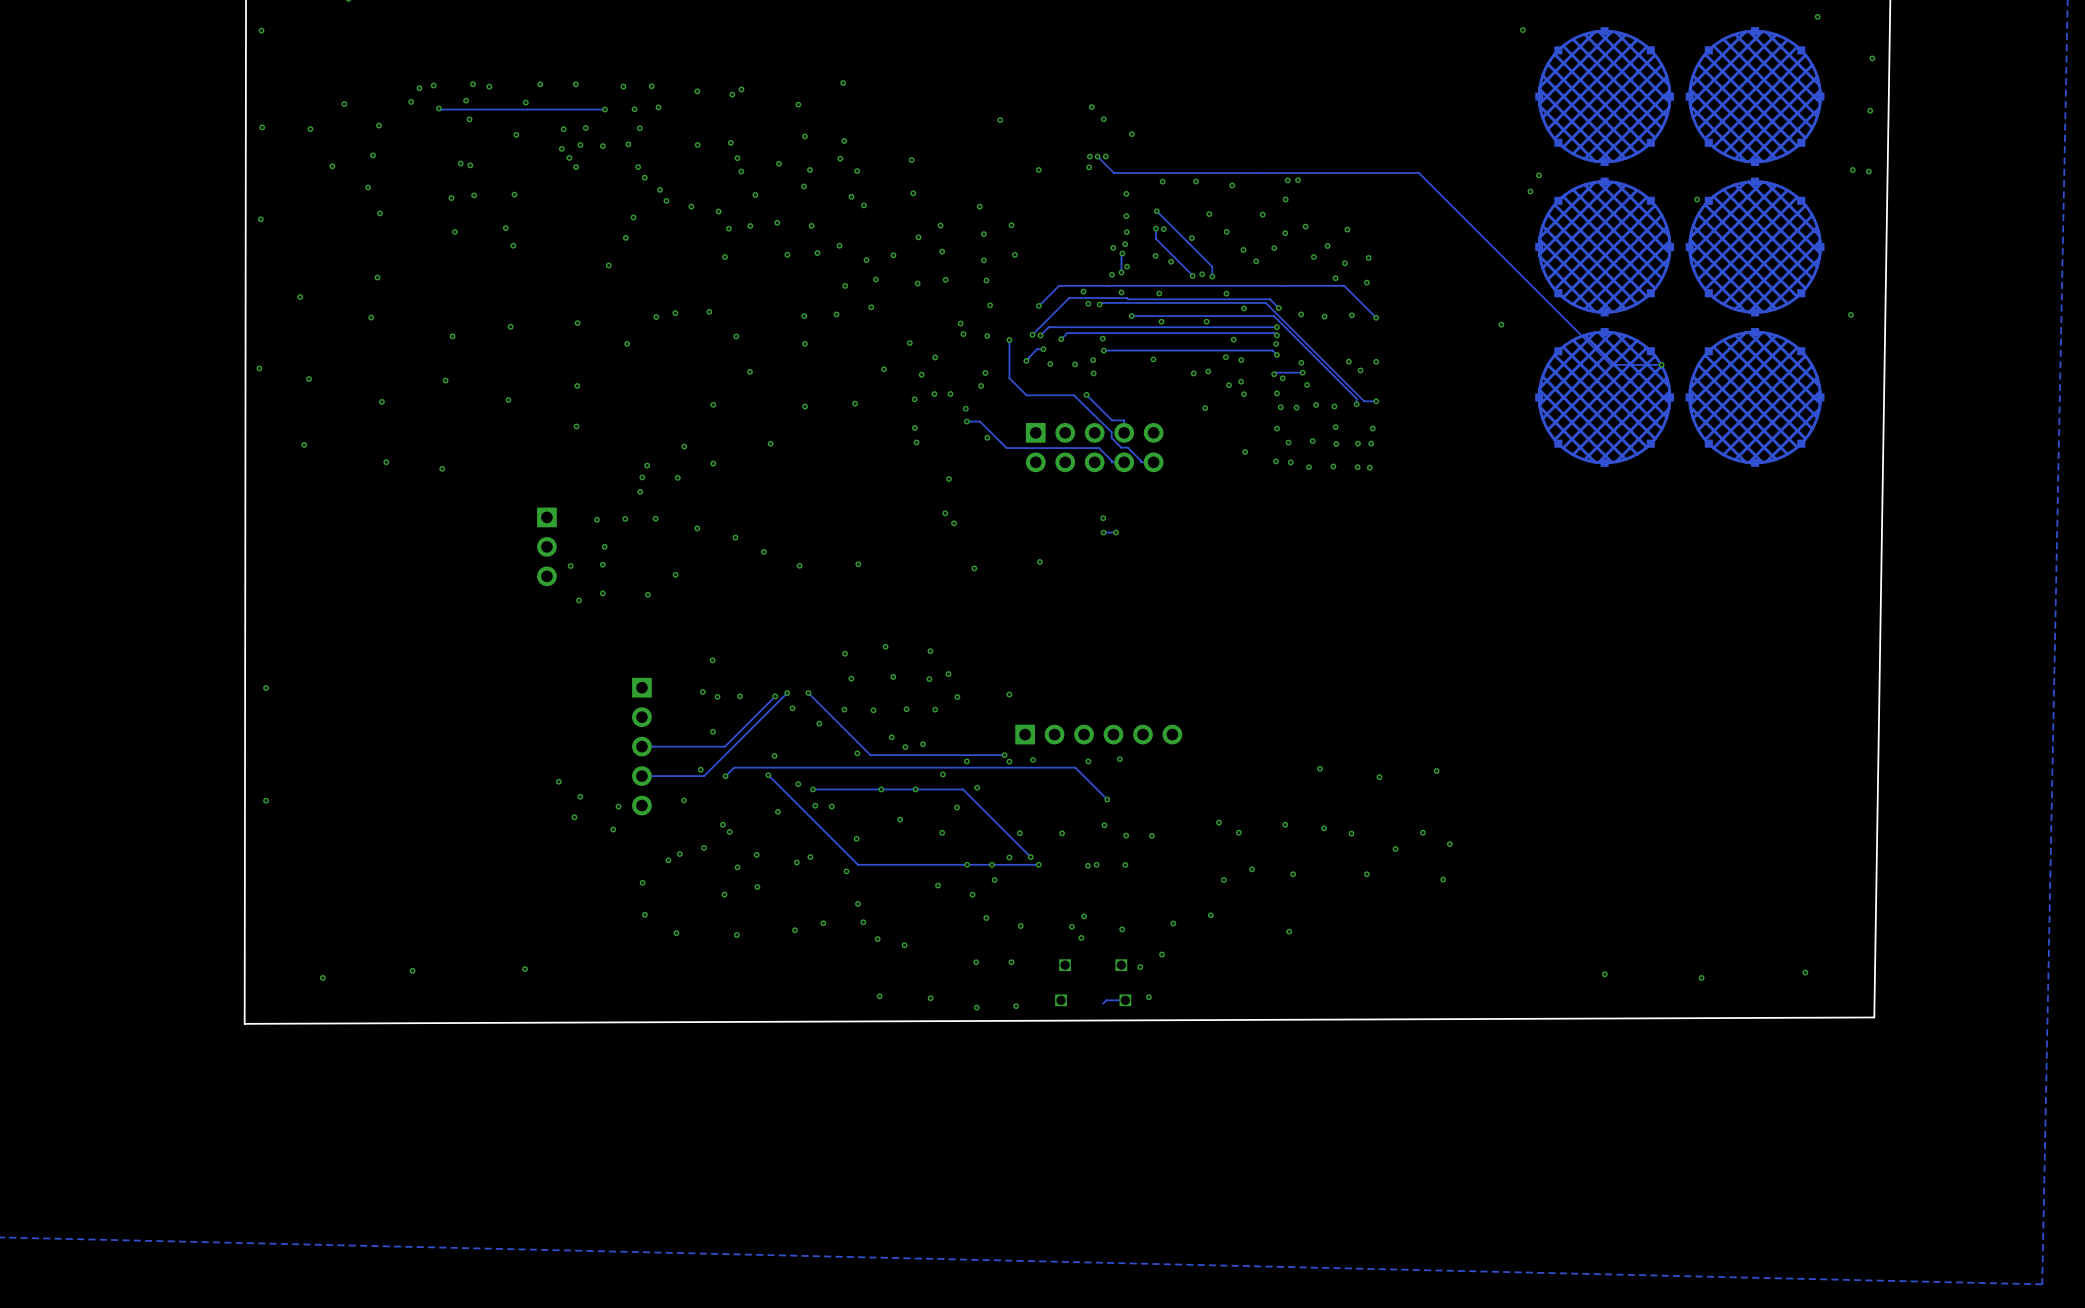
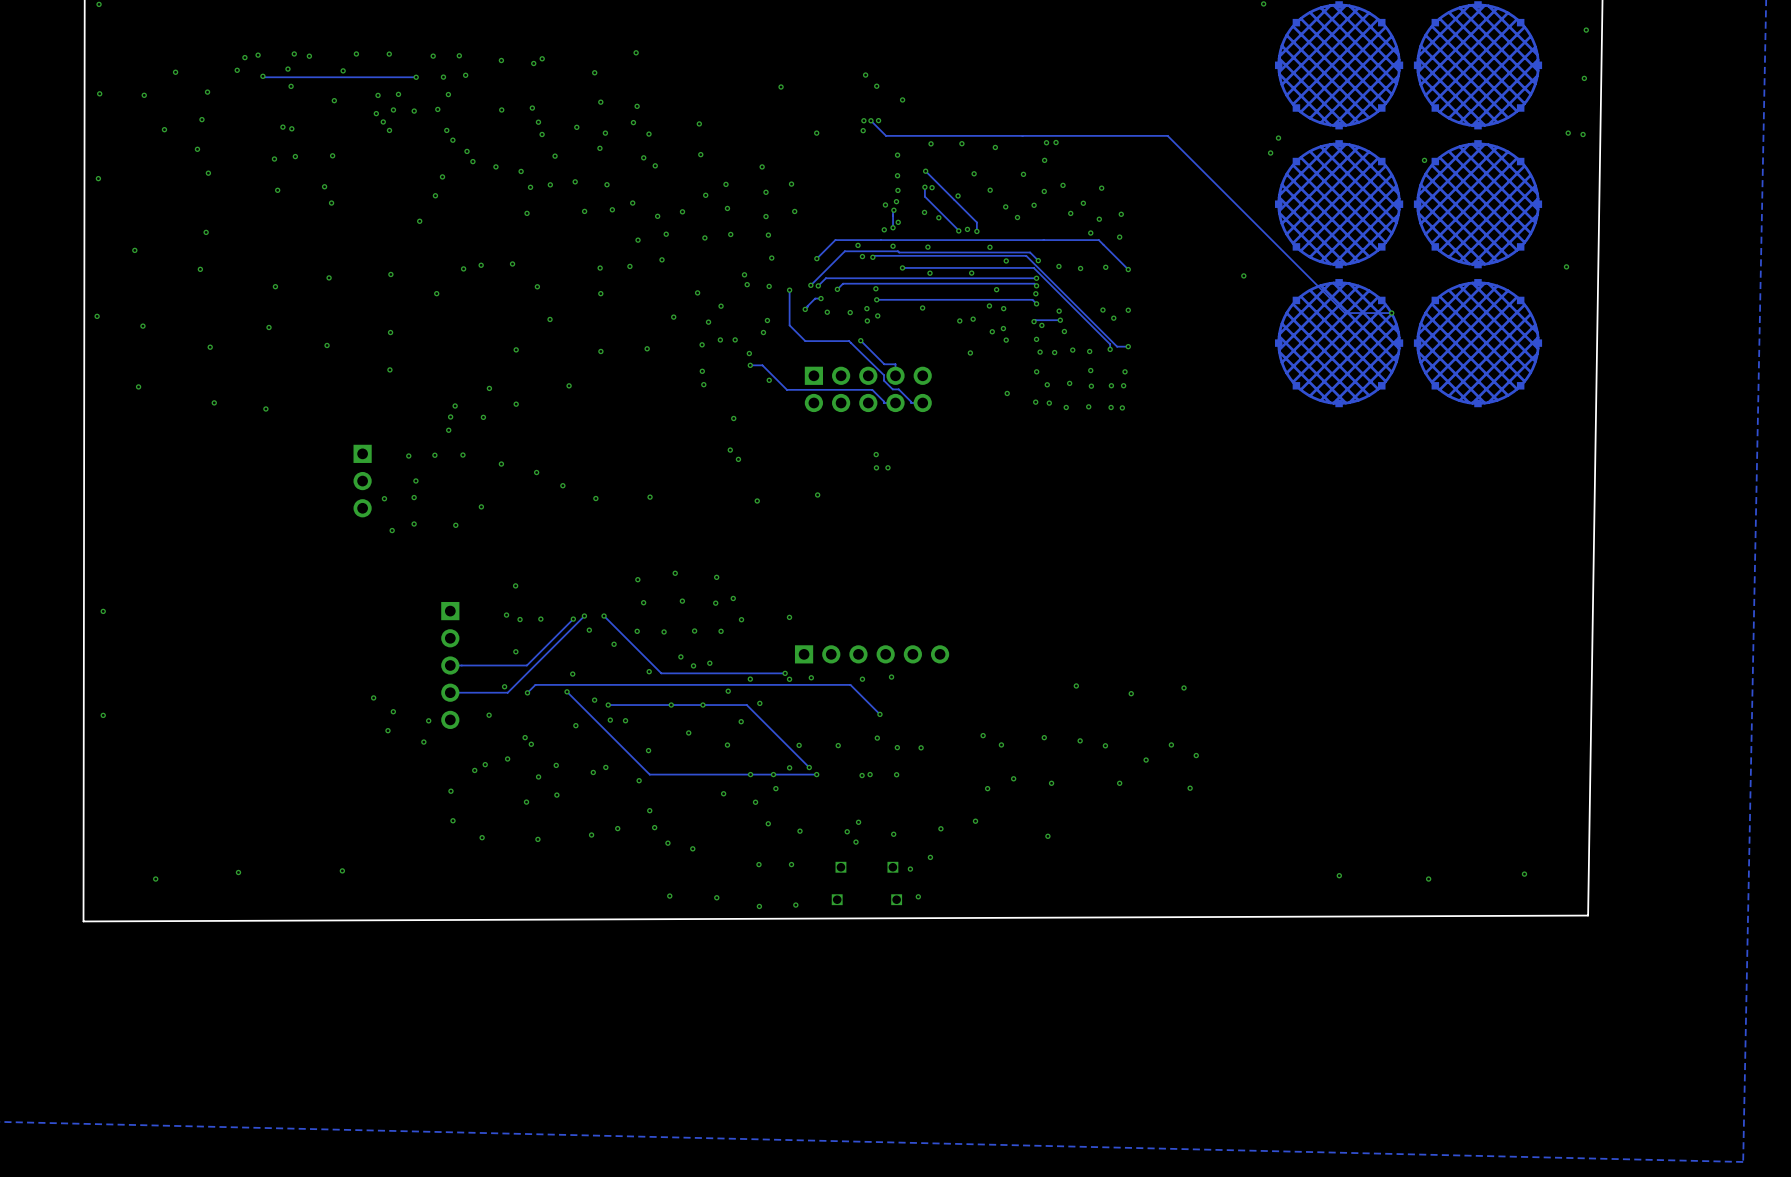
via: none -> (877, 315)
track: (1115, 532) (1103, 532) -> none
track: (1125, 1000) (1106, 1000) (1103, 1003) -> none

